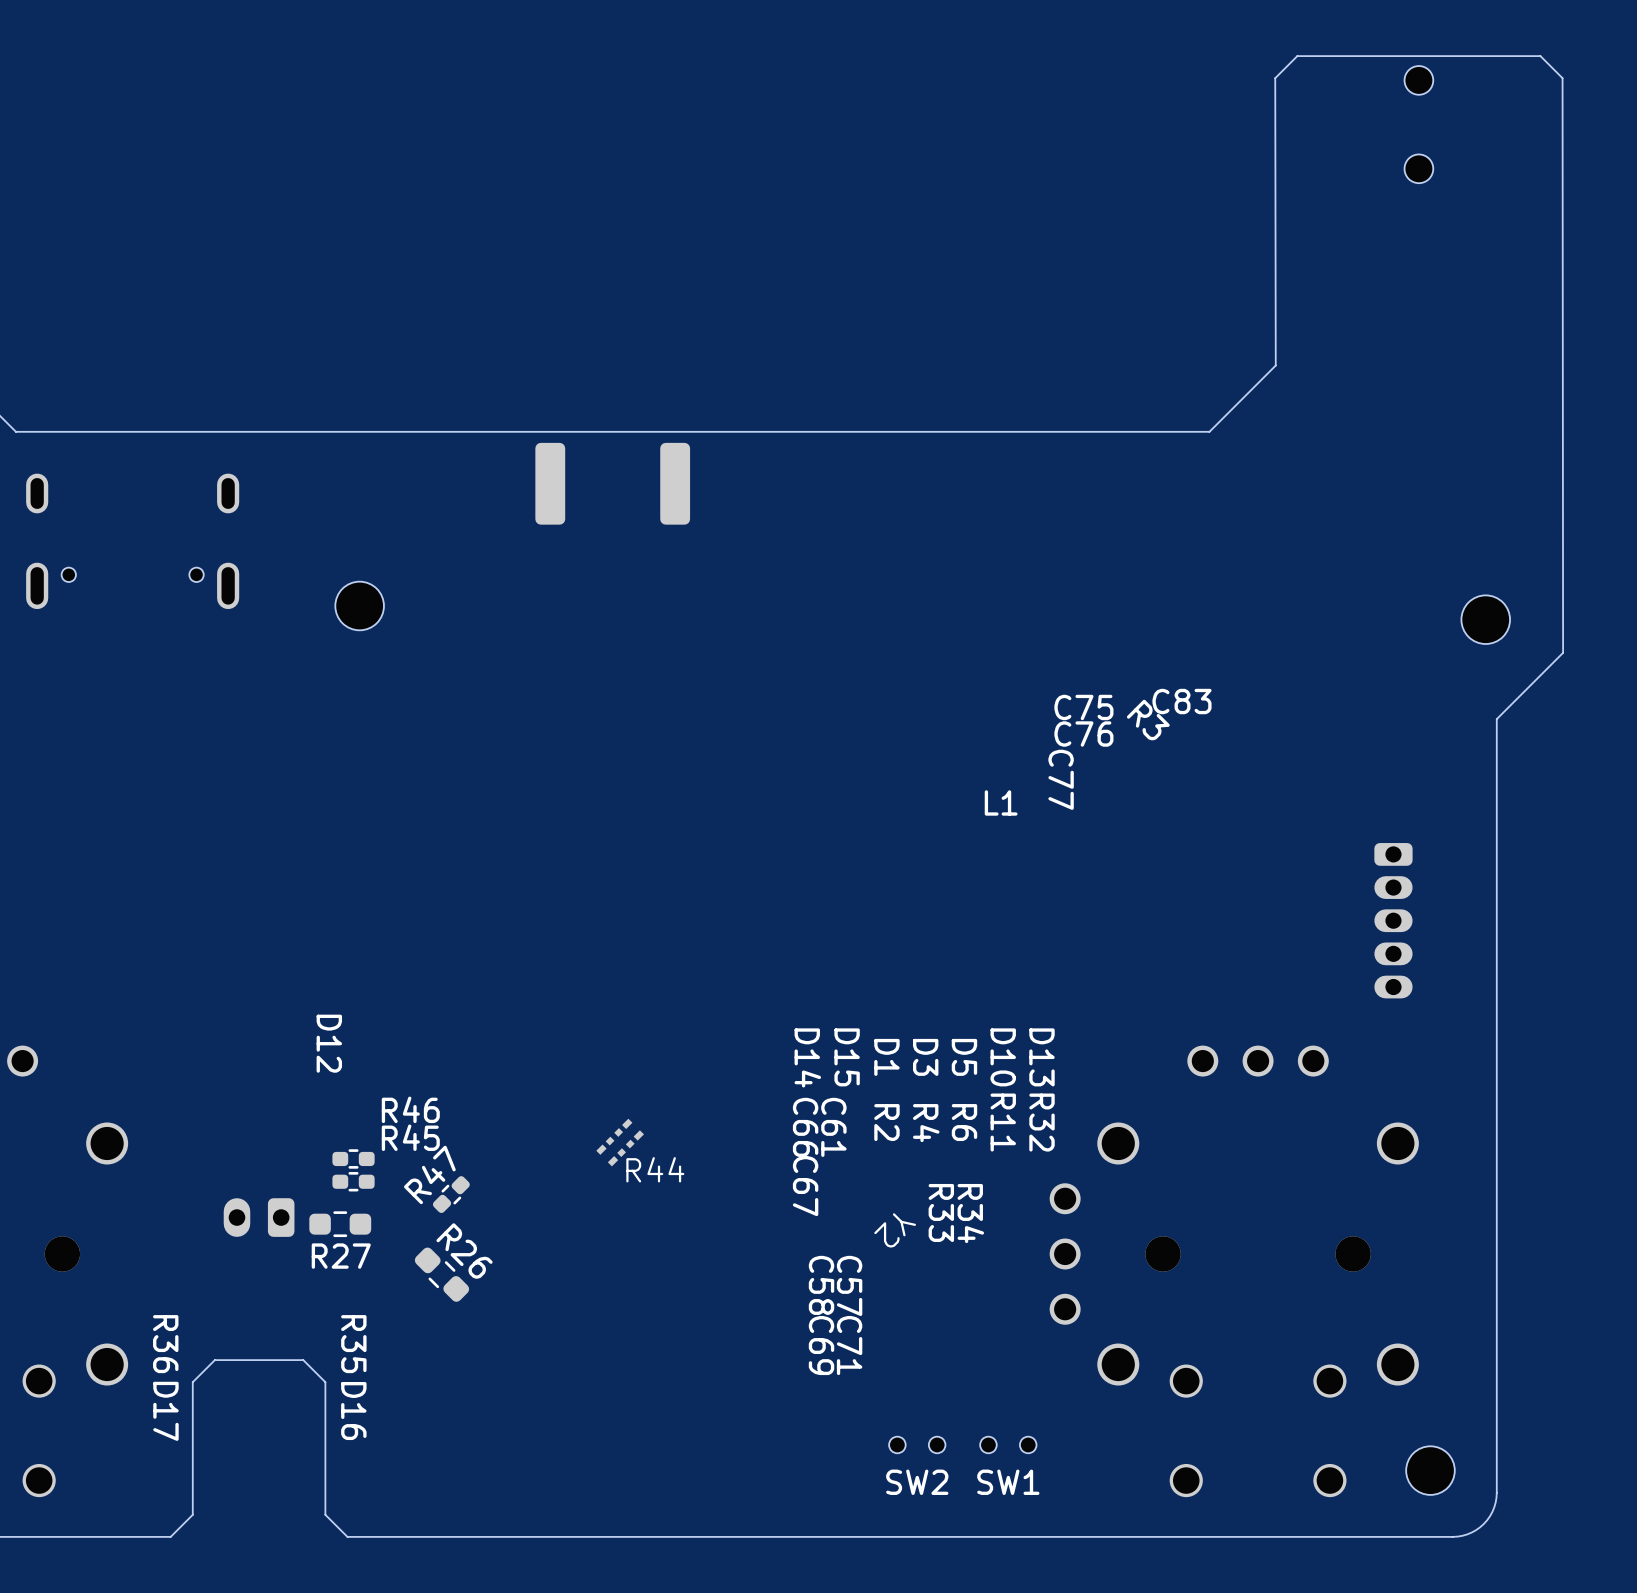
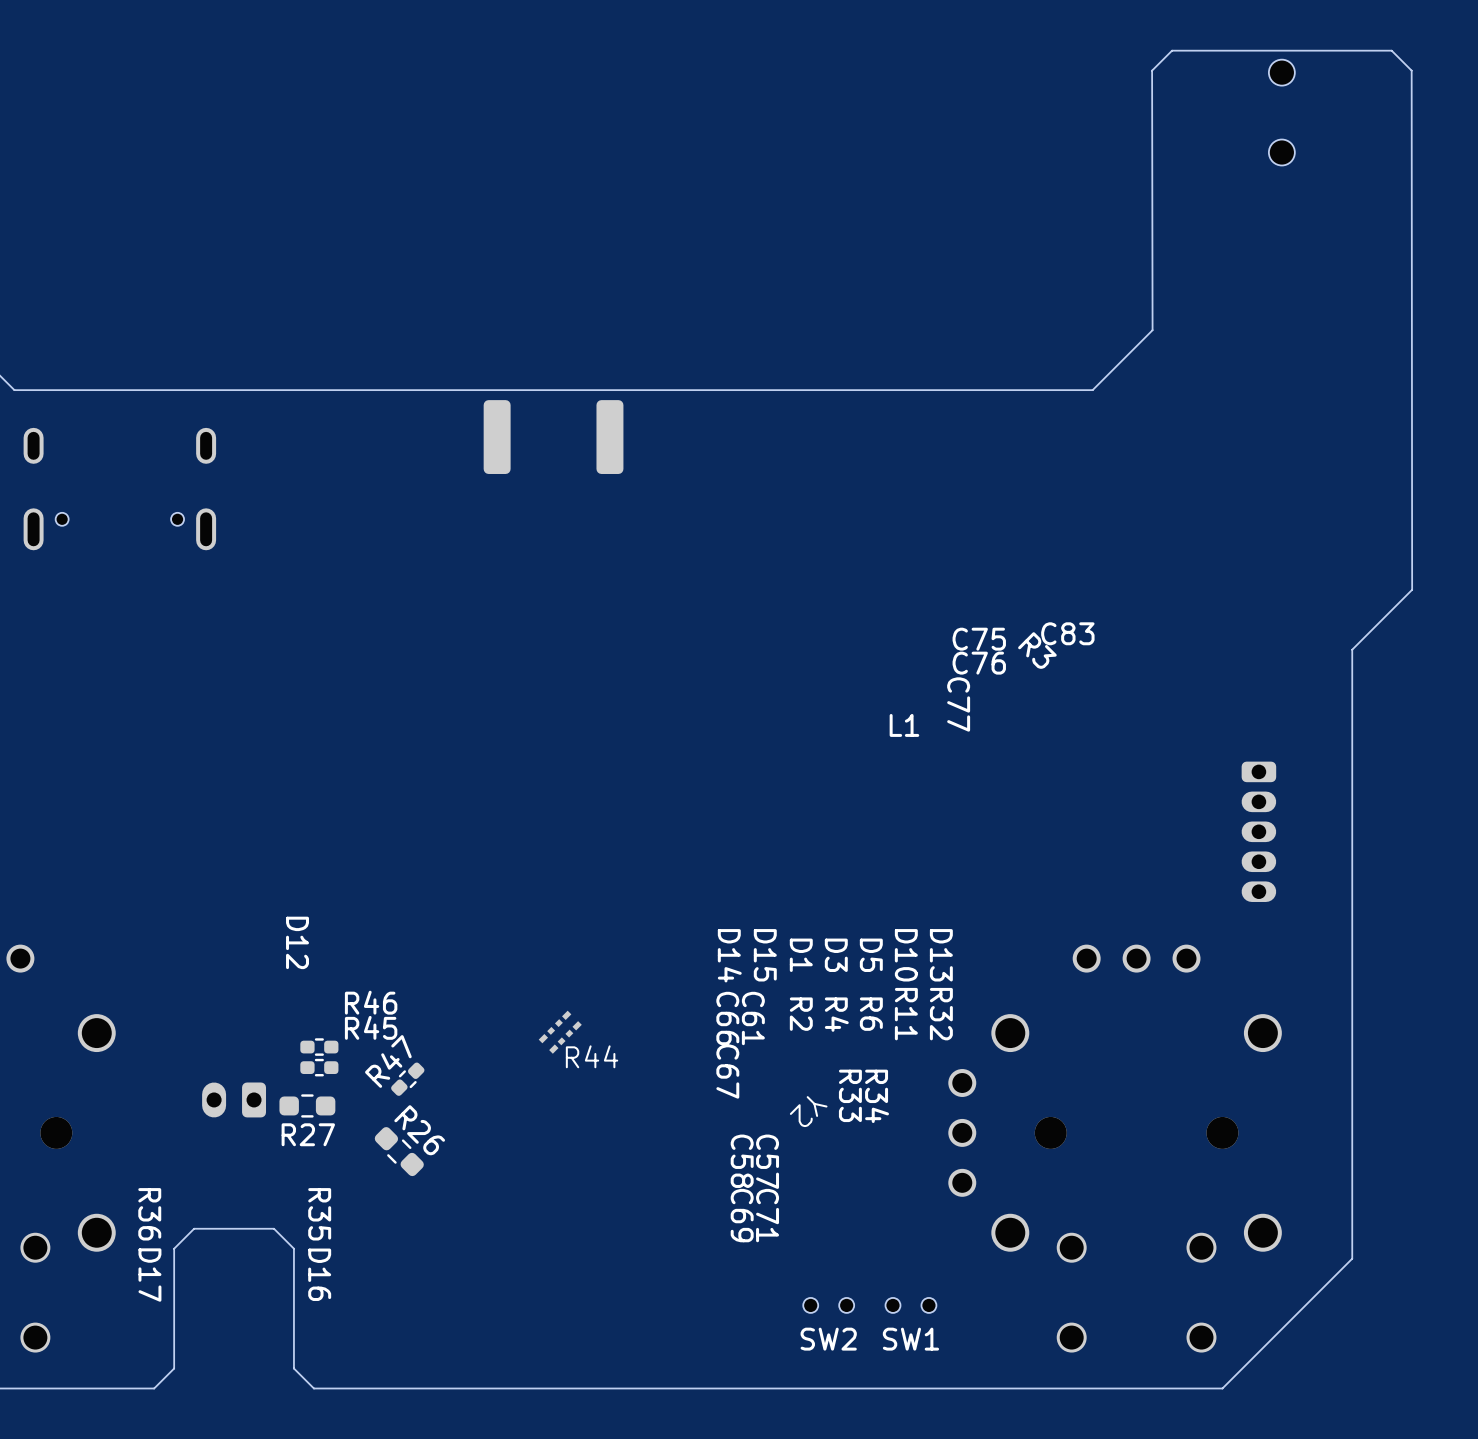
part: (359, 605) -> none
part: (1485, 619) -> none
board edge: (1496, 1393) (1496, 1497) (1492, 1511) (1483, 1523) (1471, 1532) (1457, 1536) (1353, 1536) -> (1352, 1258) (1222, 1388)
part: (1430, 1470) -> none

